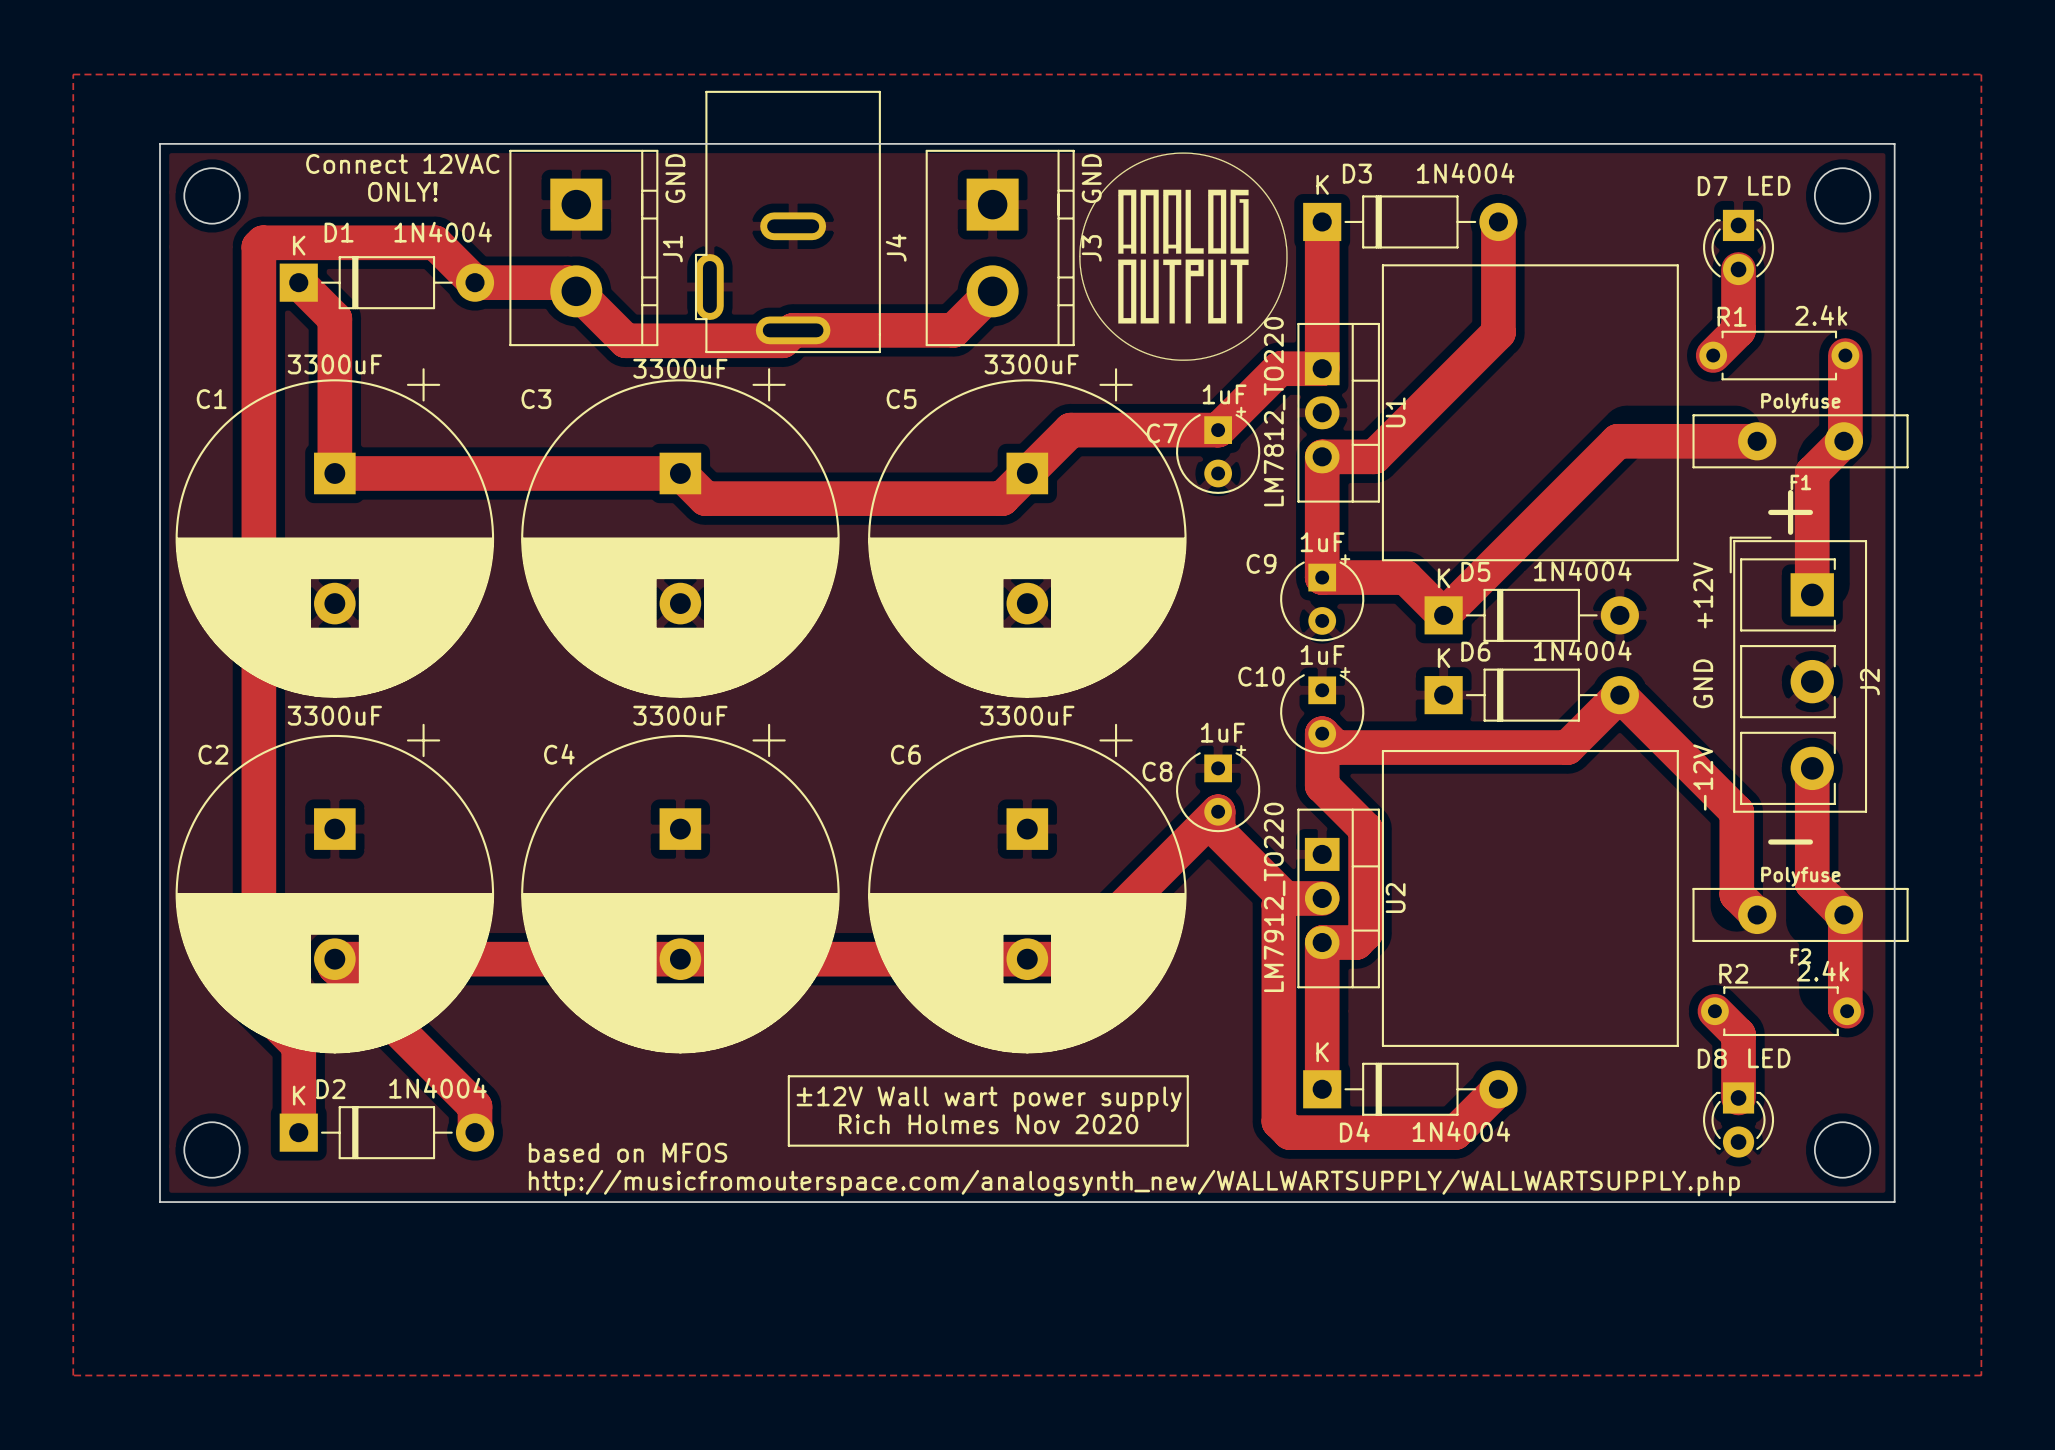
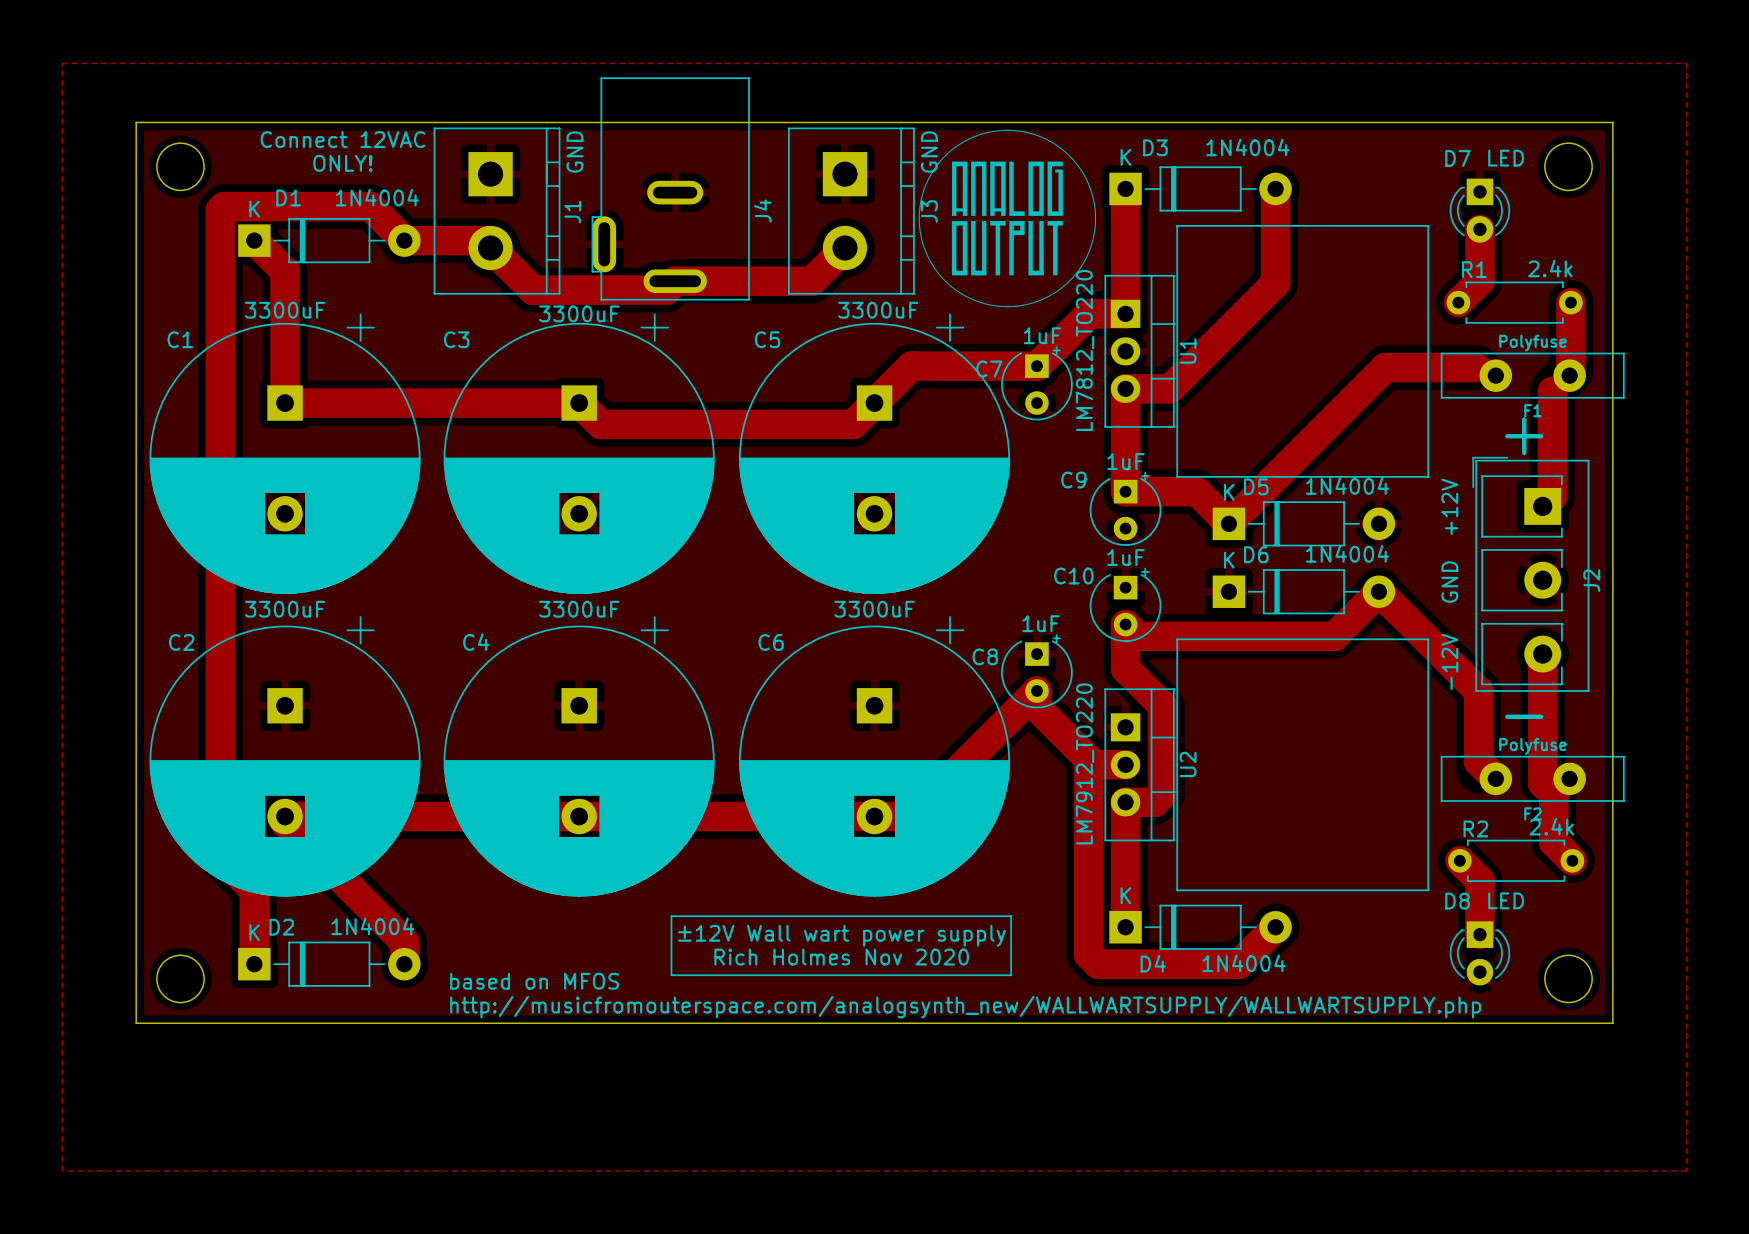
track: (1845, 436) (1845, 439) (1812, 472) (1812, 594) -> (1552, 391) (1552, 496) (1542, 506)
track: (1617, 441) (1757, 441) -> (1377, 375) (1385, 367) (1476, 367)
track: (1812, 883) (1845, 916) (1845, 1009) -> (1542, 751) (1542, 783) (1553, 794) (1553, 842) (1570, 859)

